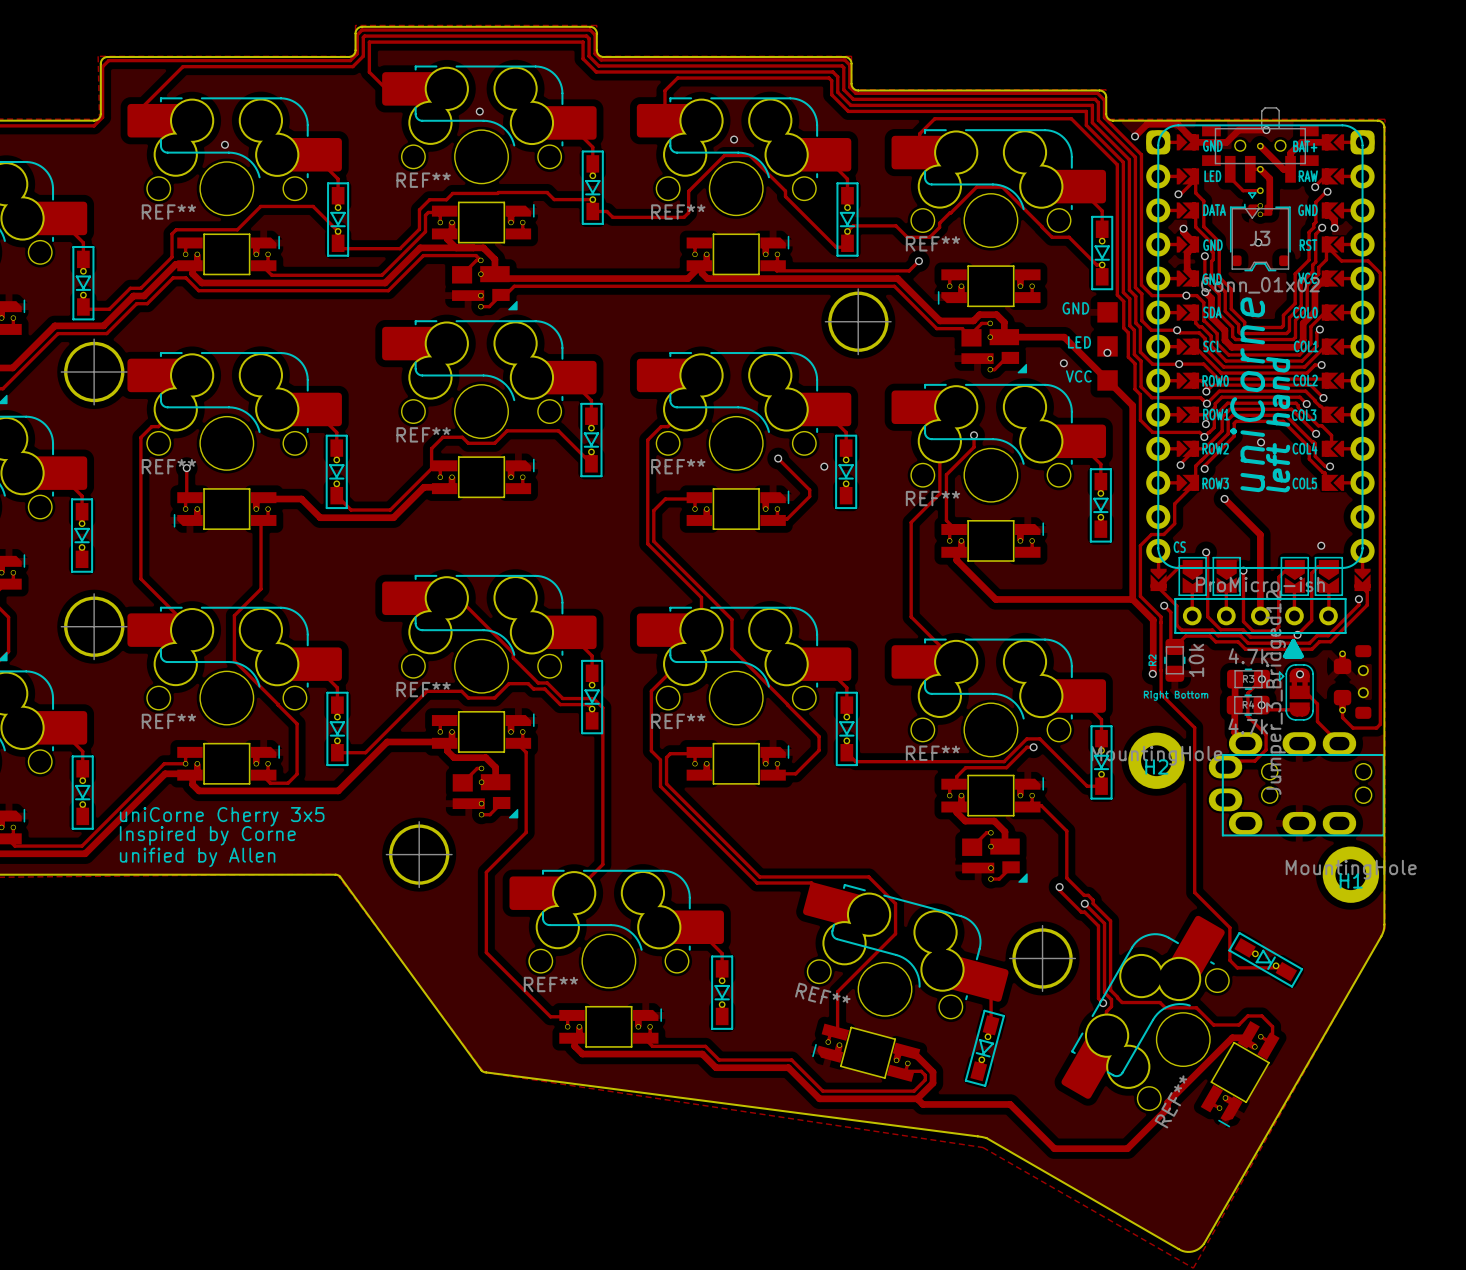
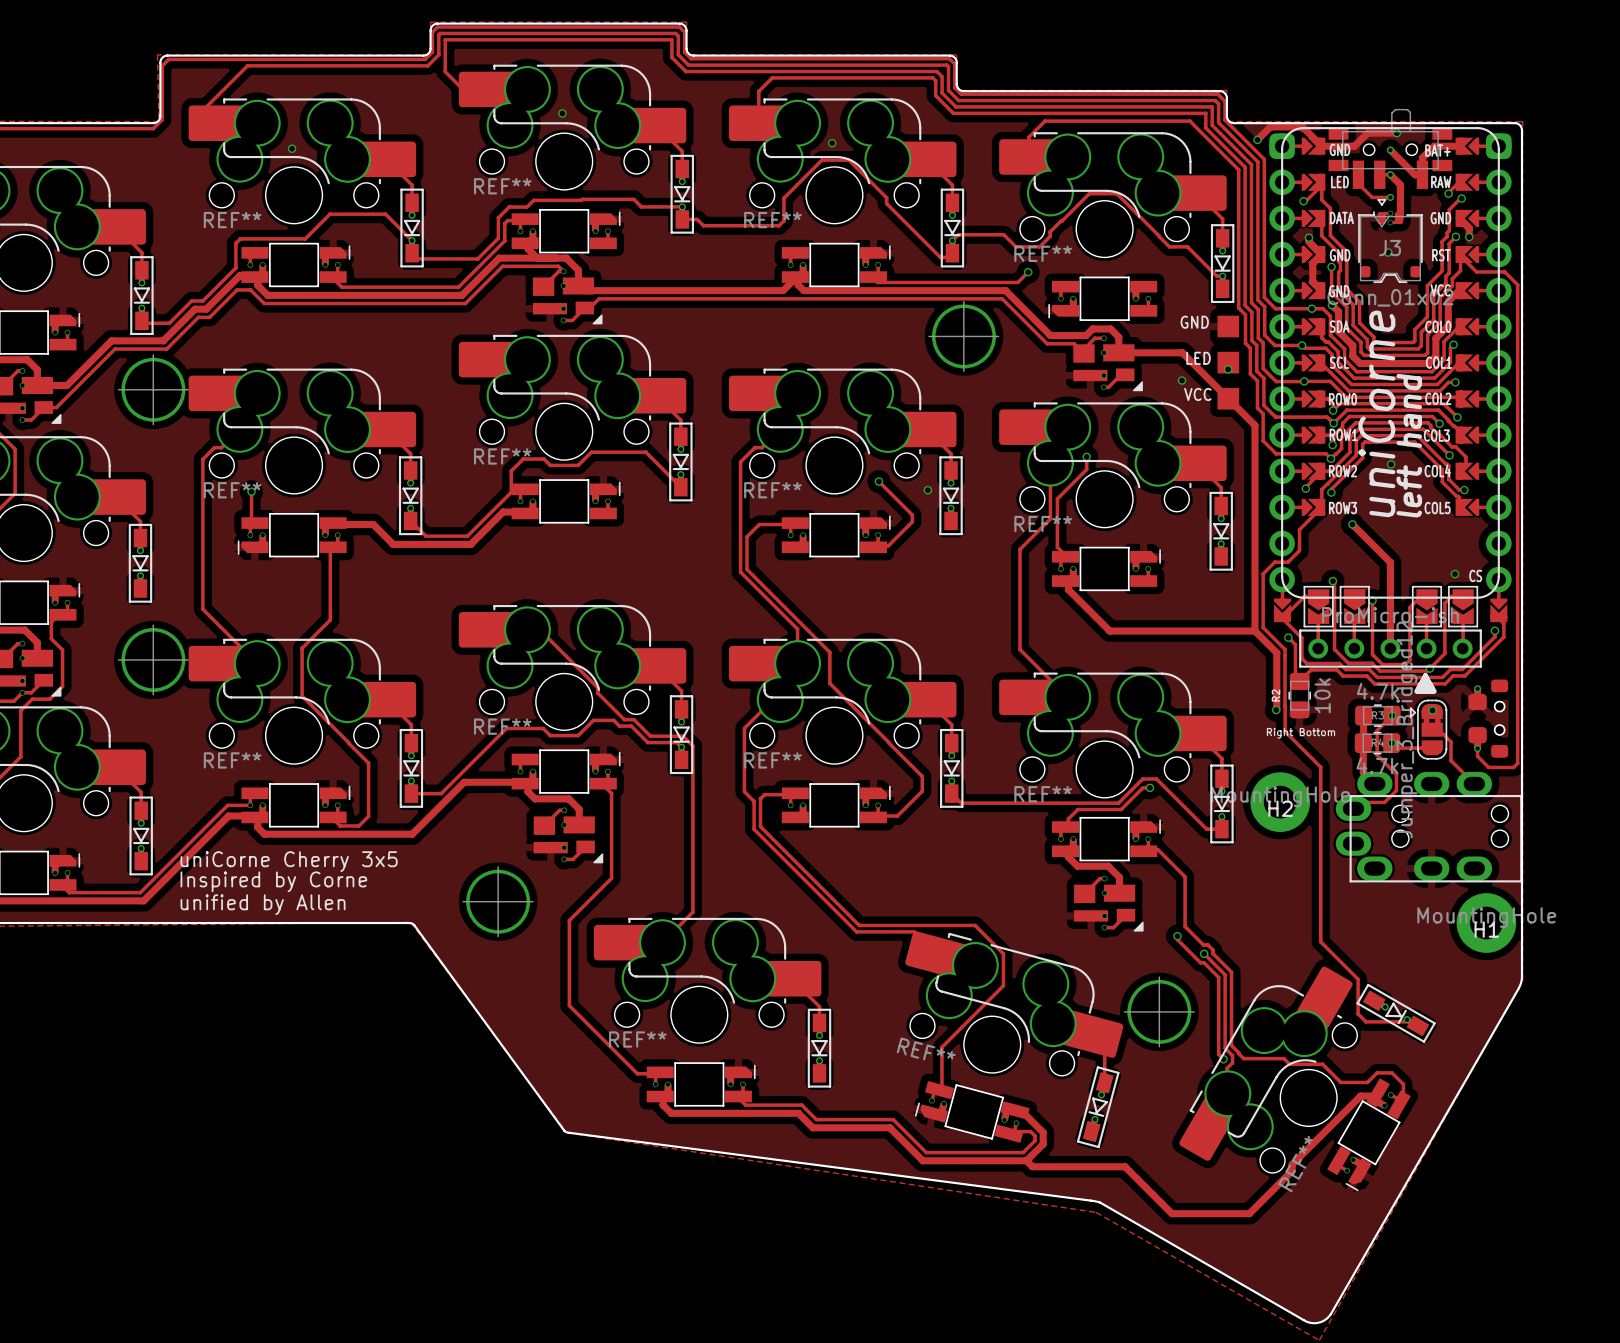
part text position: CS (1179, 547) -> CS (1475, 575)

